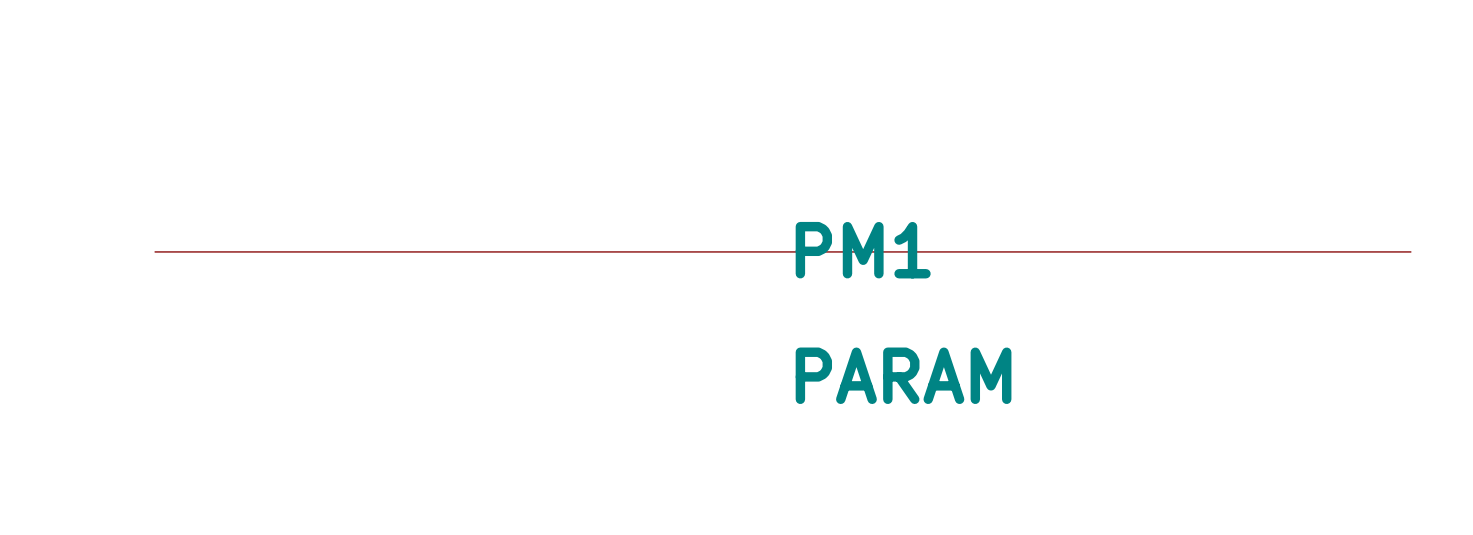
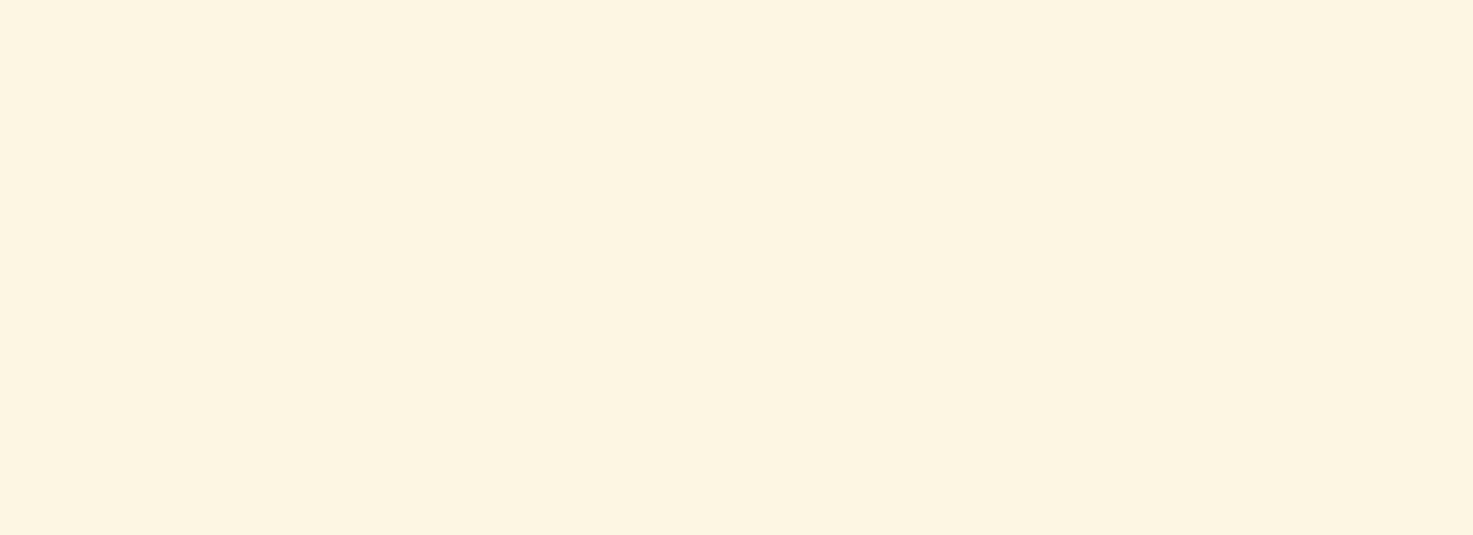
PM1: PARAM (782, 251) -> none

